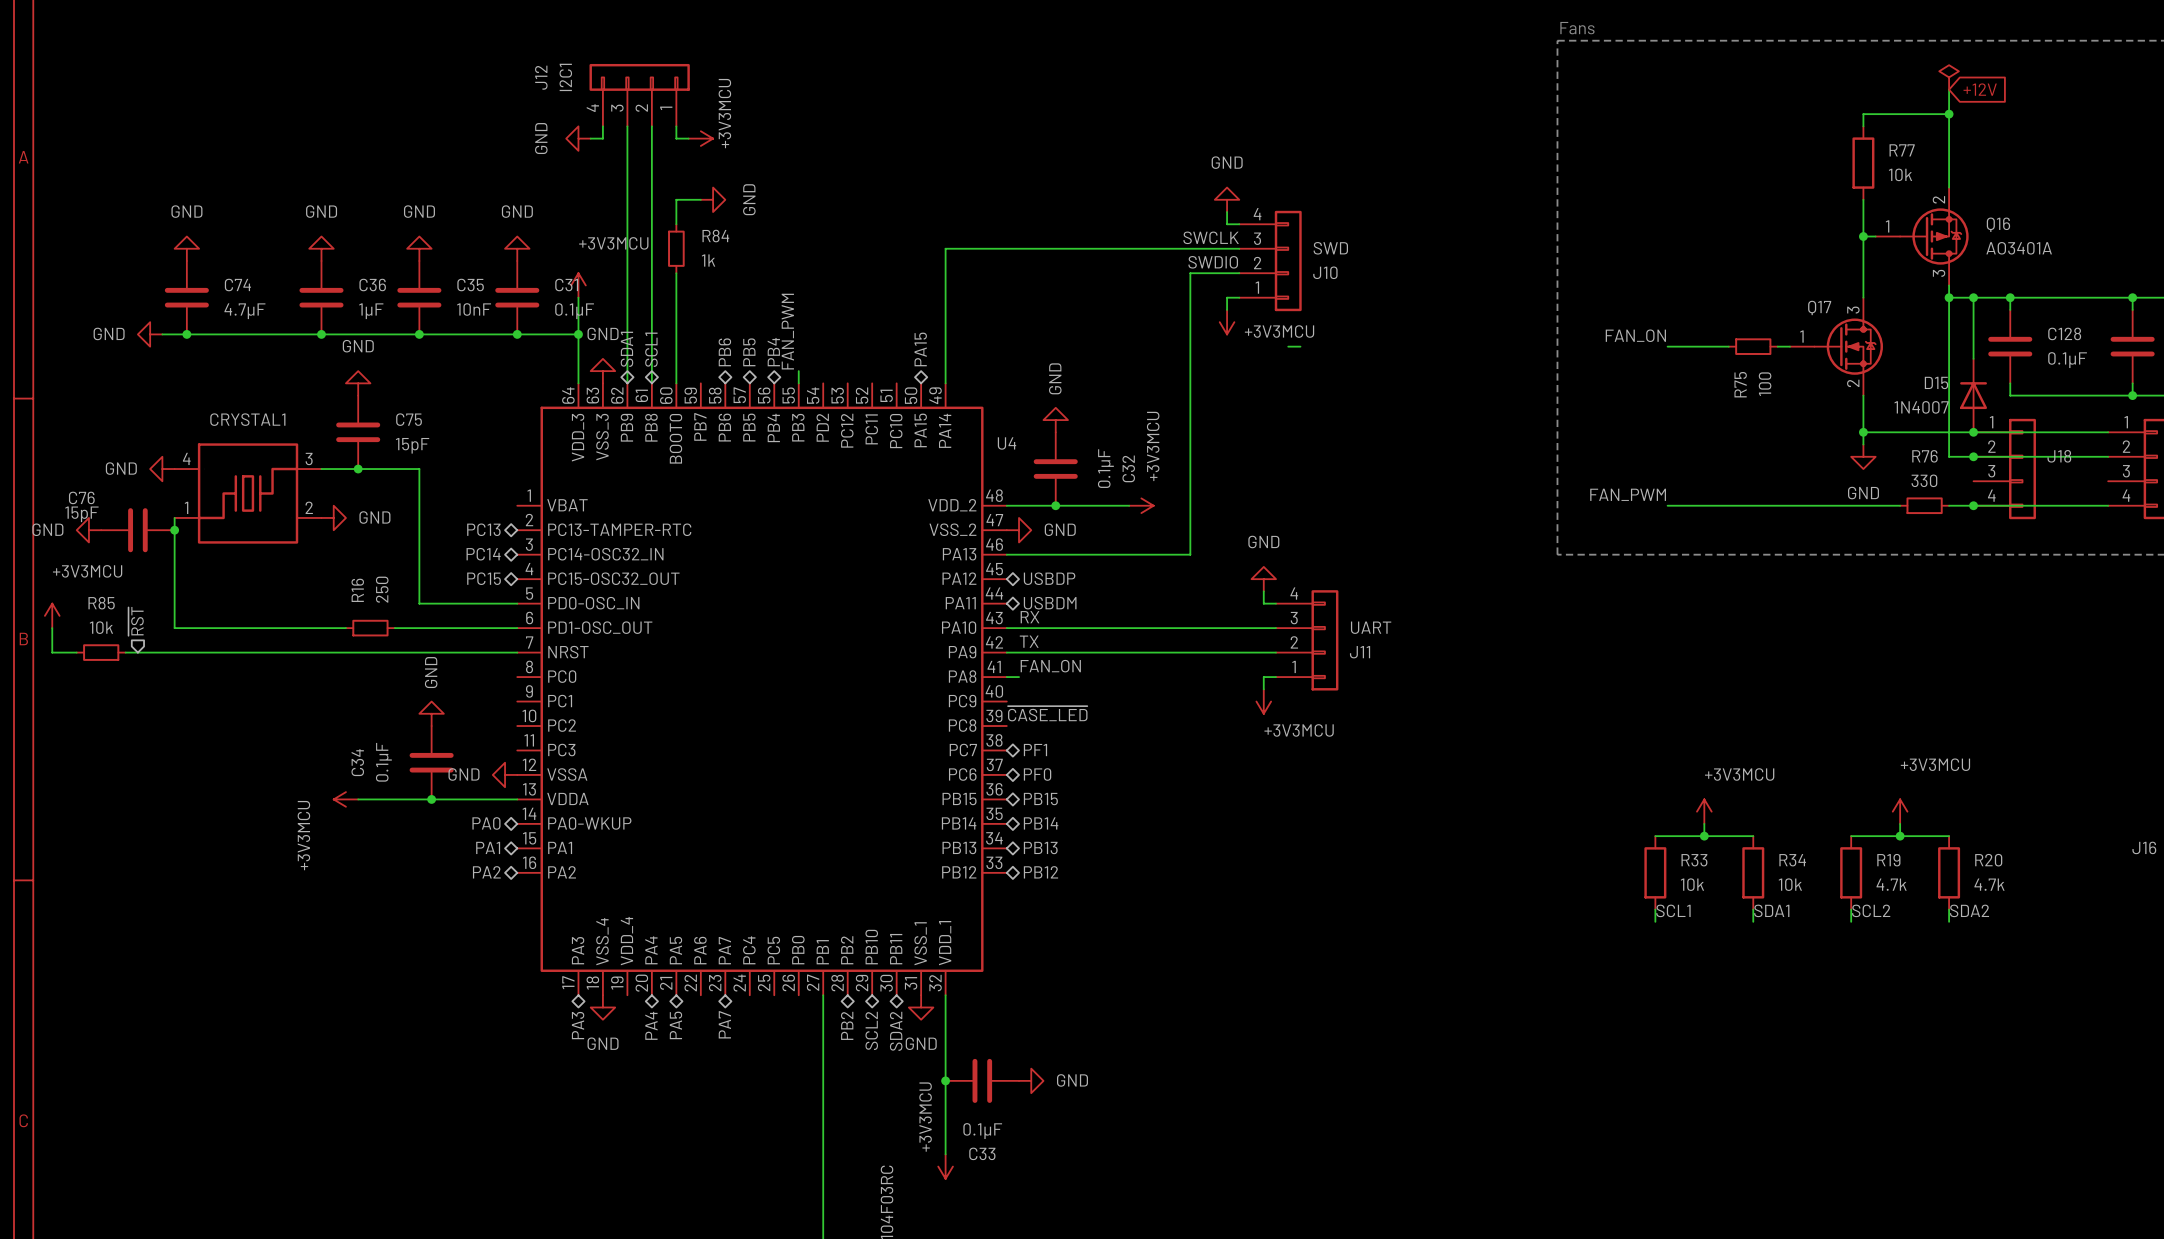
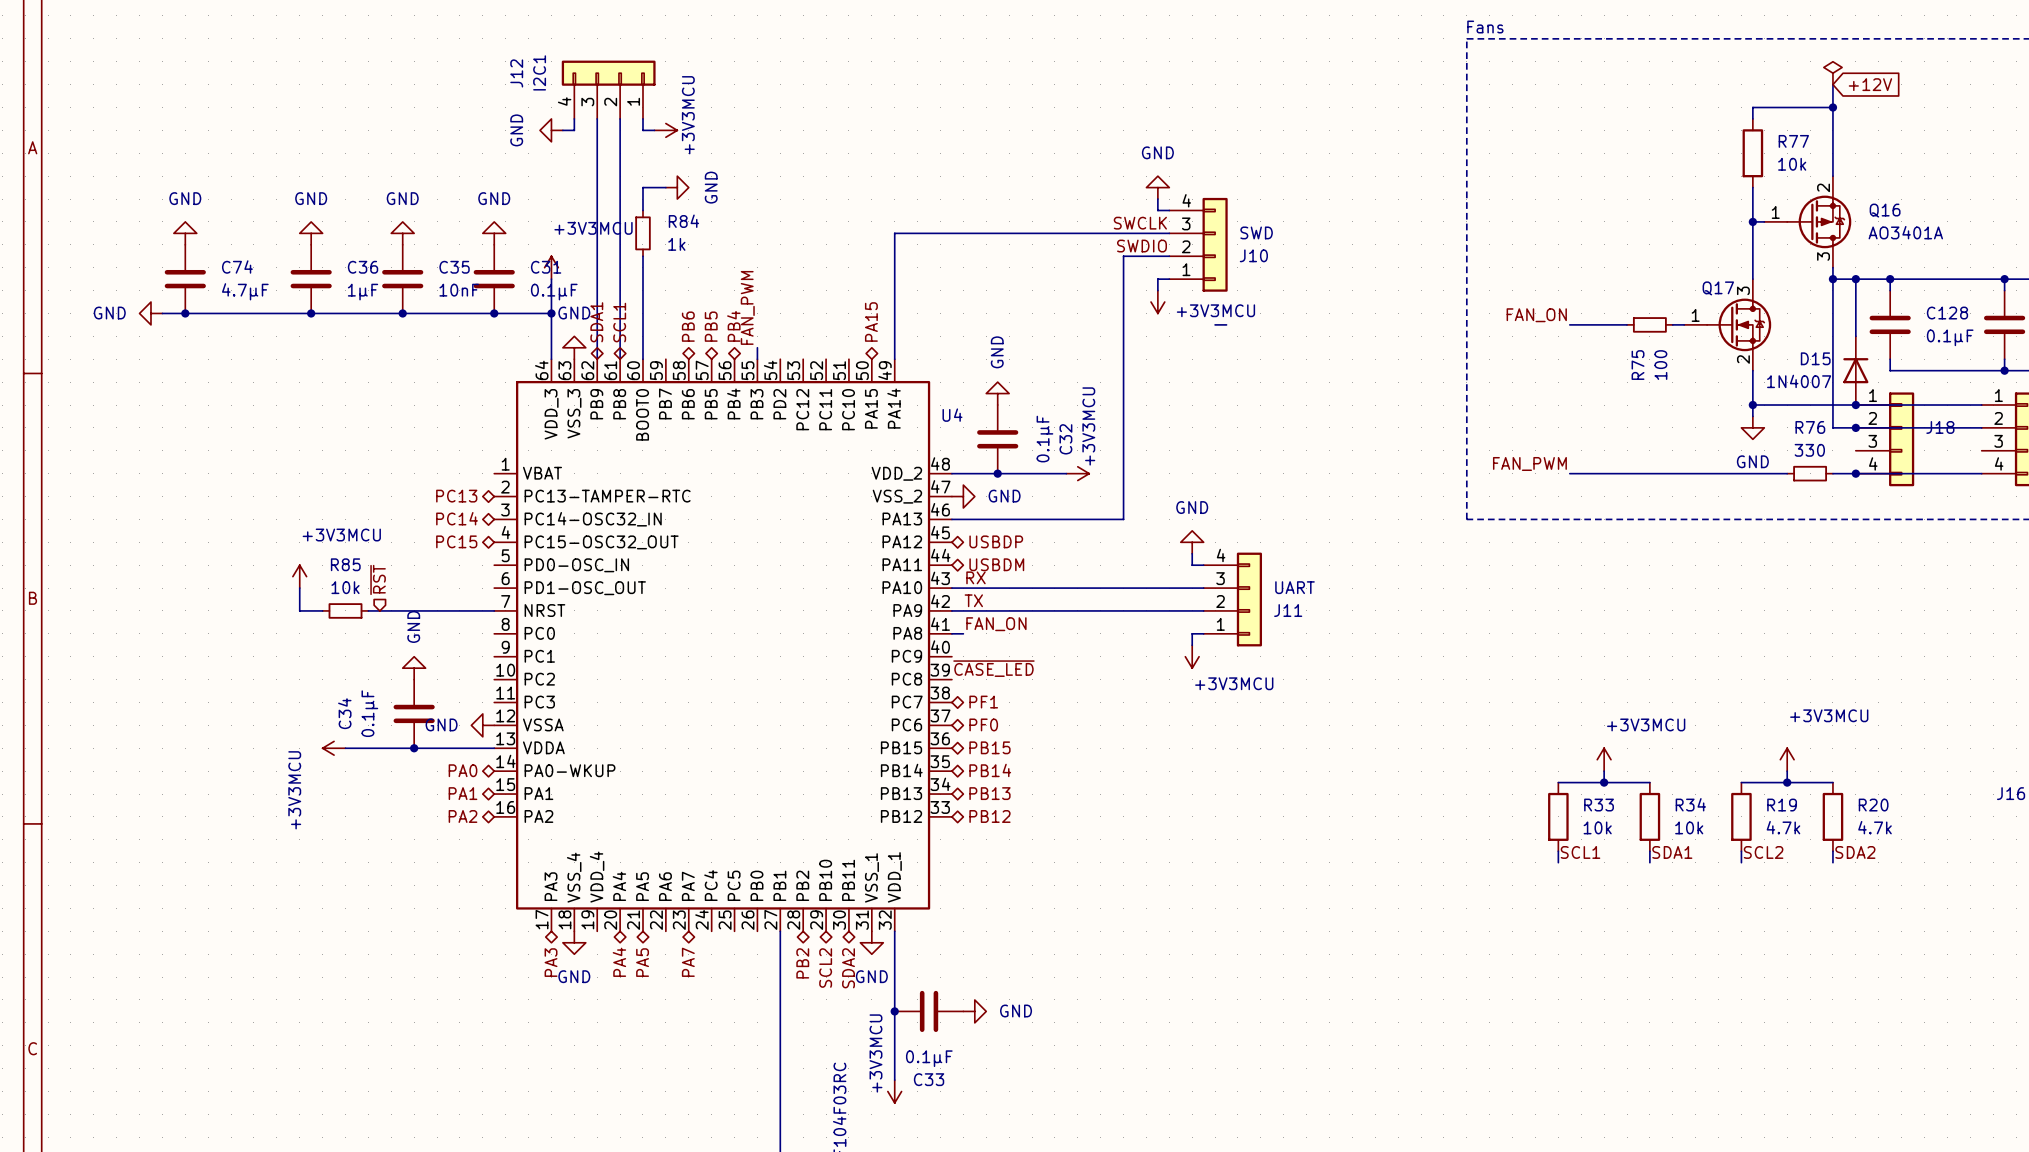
power symbol: GND (358, 383) -> none
C75: 15pF (358, 432) -> none
power symbol: GND (162, 469) -> none
wire: (321, 469) (419, 469) (419, 603) (517, 603) -> none
junction: (358, 469) -> none
CRYSTAL1: (248, 493) -> none
wire: (174, 517) (174, 628) (345, 628) -> none
power symbol: GND (333, 517) -> none
power symbol: GND (88, 530) -> none
C76: 15pF (137, 530) -> none
junction: (174, 530) -> none
power symbol: +3V3MCU (52, 615) -> none
power symbol: none -> +3V3MCU (299, 576)
hierarchical label: ~{RST} (136, 621) -> none
hierarchical label: none -> ~{RST} (378, 579)
wire: (52, 628) (52, 652) (76, 652) -> none
R16: 250 (370, 628) -> none
wire: (394, 628) (517, 628) -> none
R85 position: (101, 652) -> (345, 610)
wire: (125, 652) (309, 652) -> (299, 588) (299, 610)
wire: (333, 652) (382, 652) -> none

